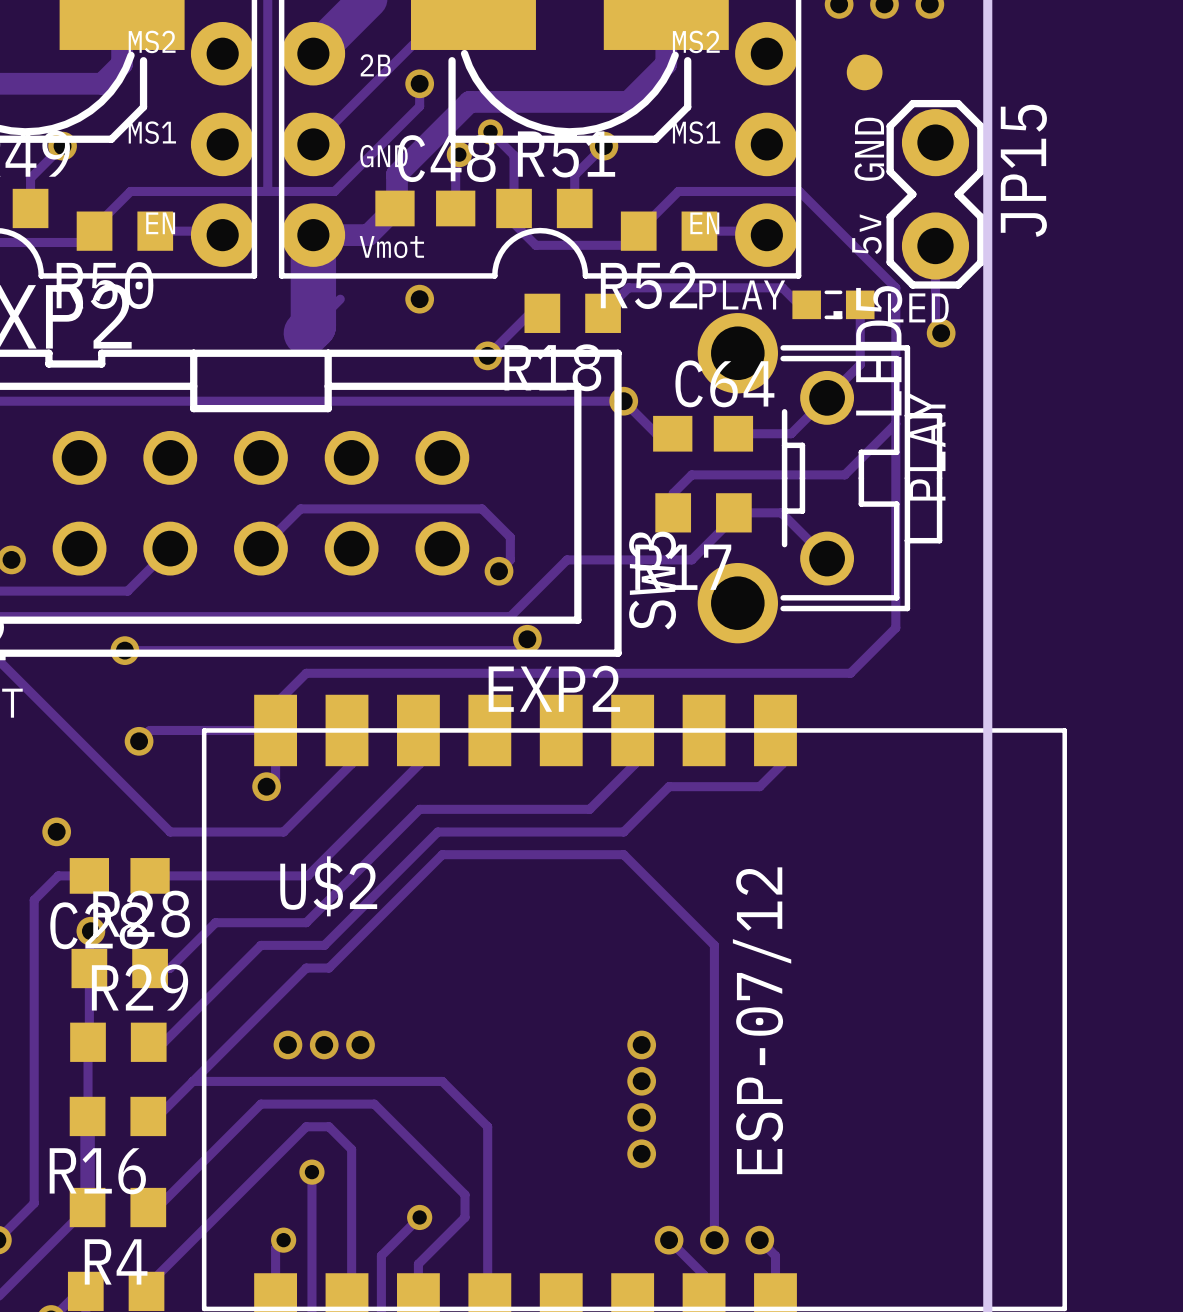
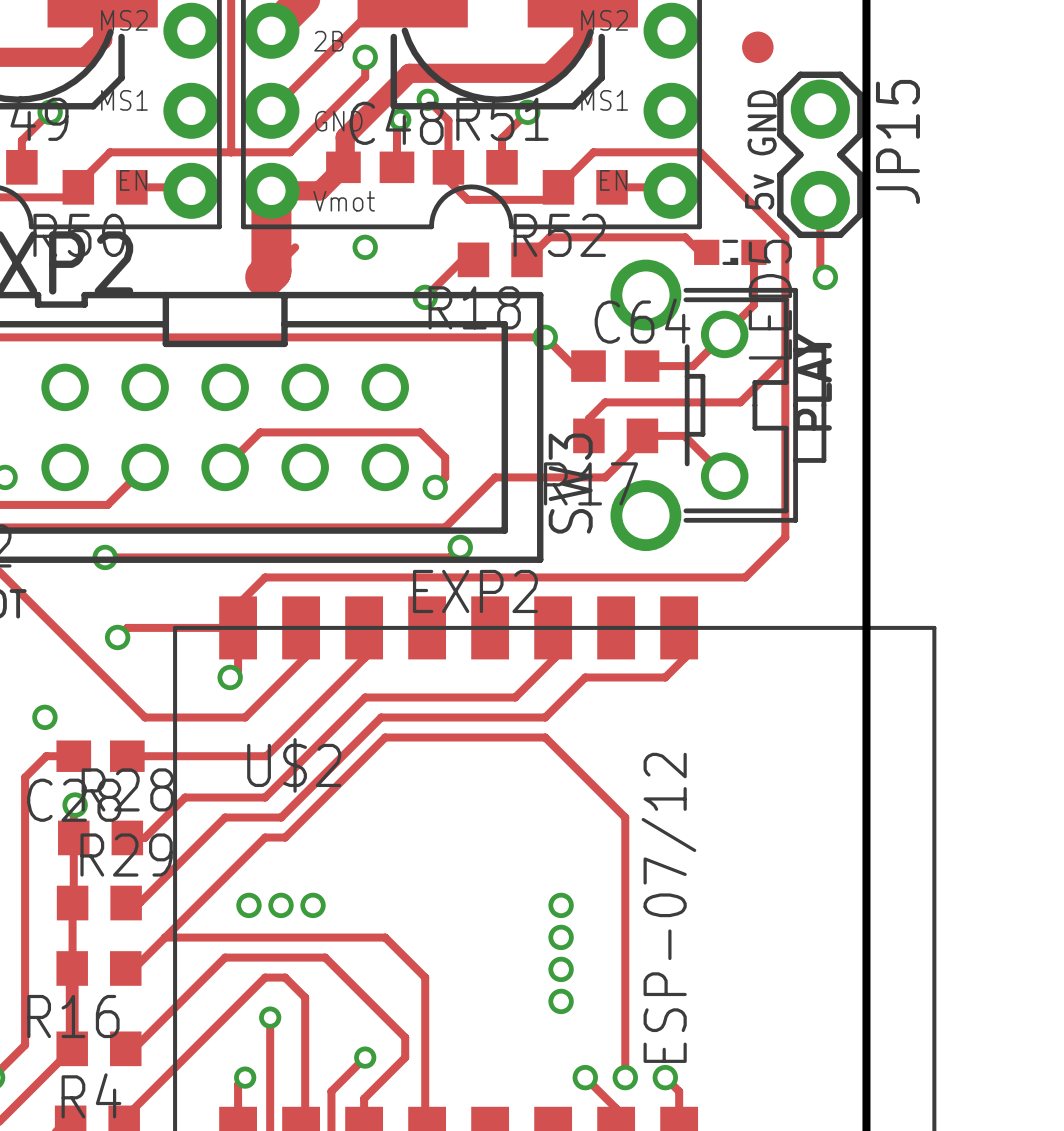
text: PLAY (742, 294) -> none
text: LED (918, 307) -> none

